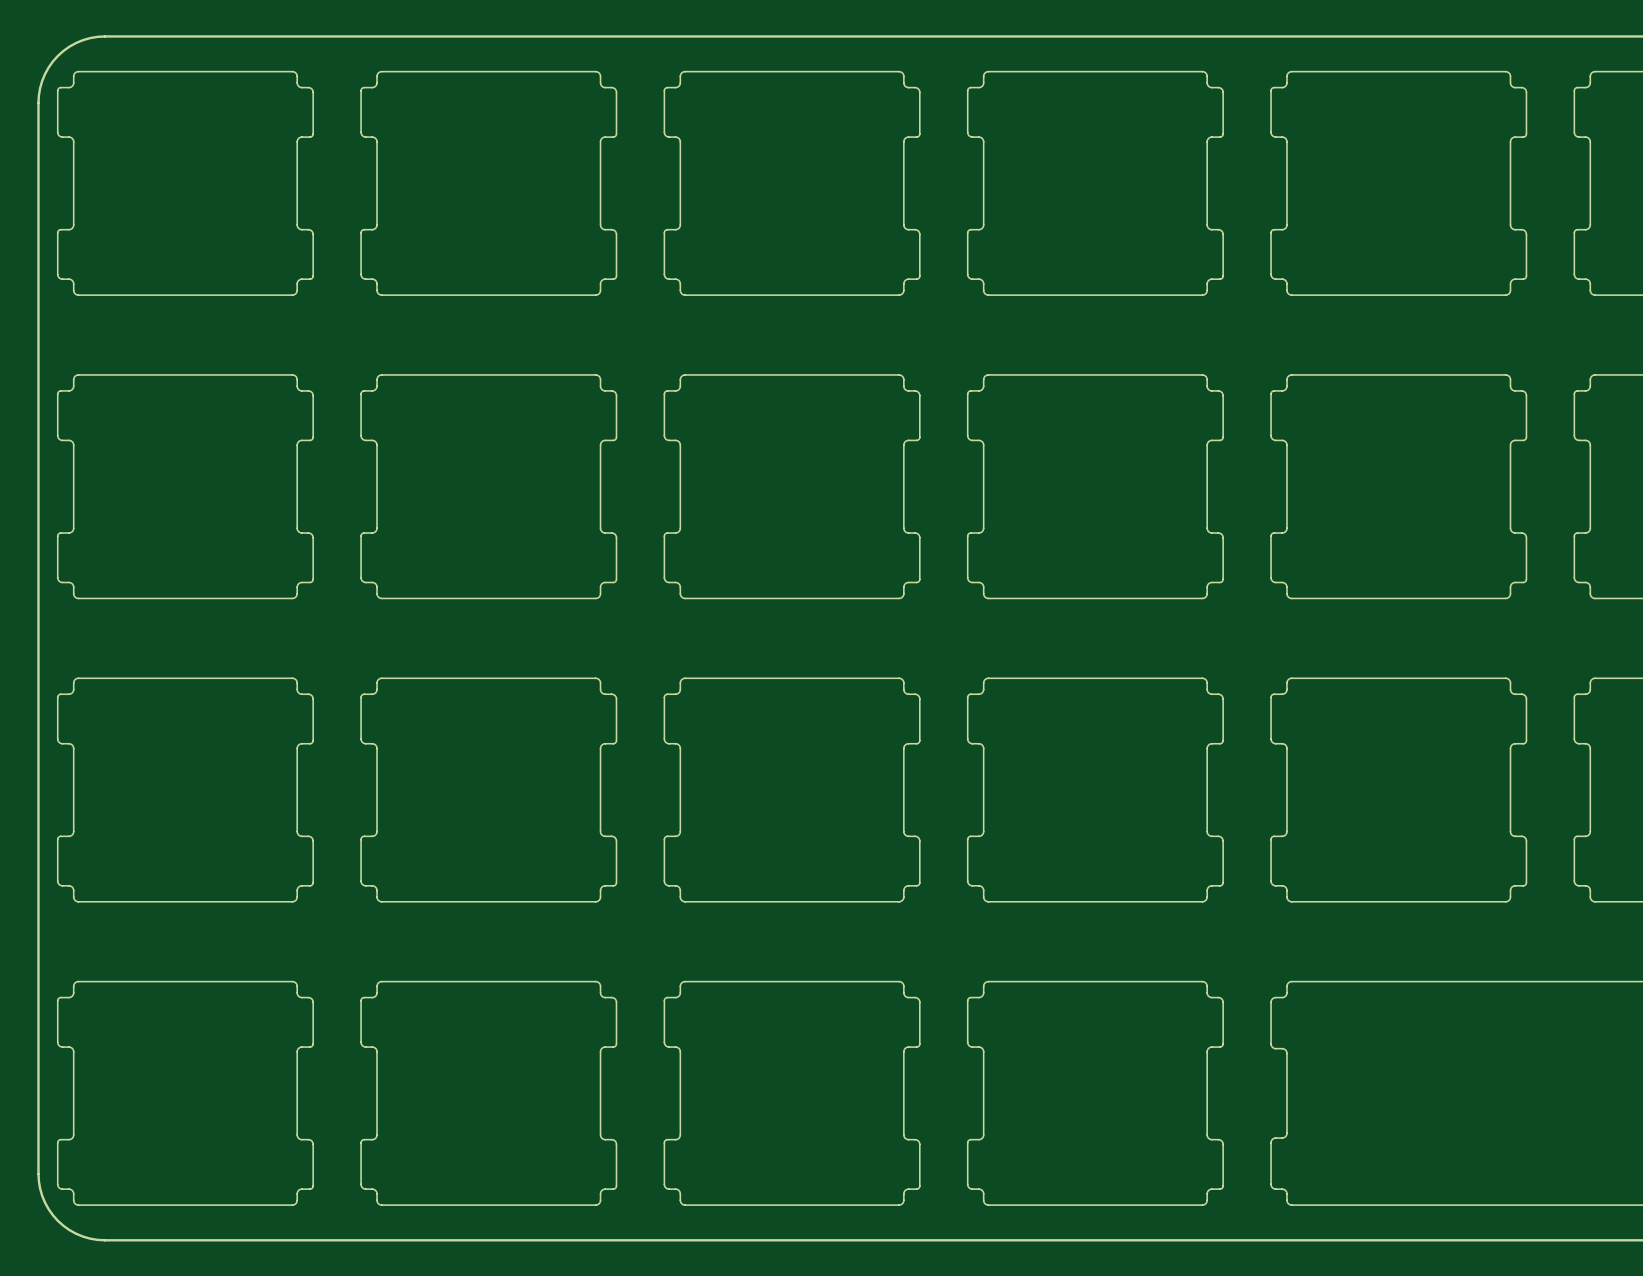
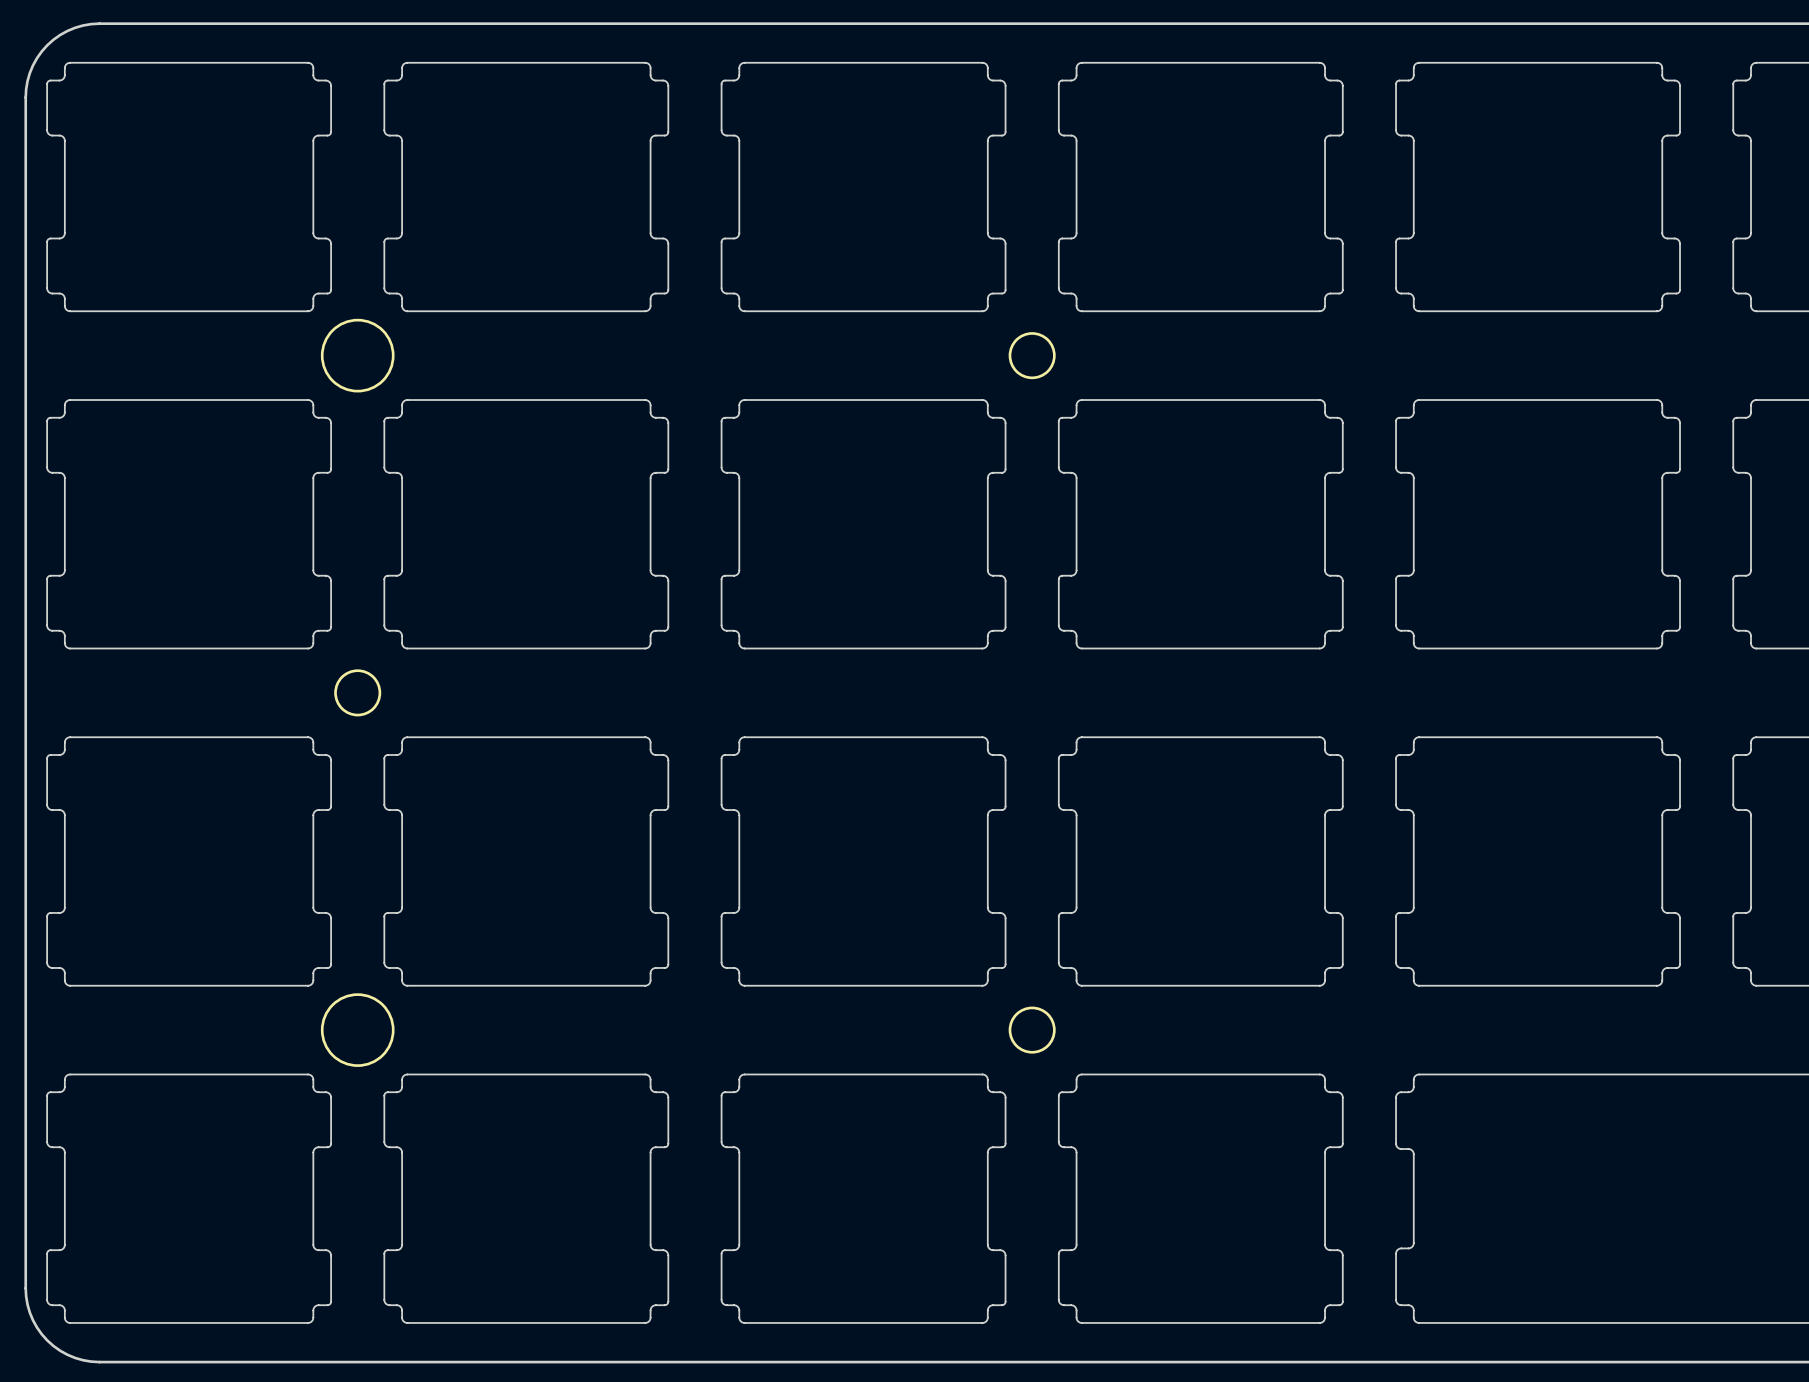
drawing: none -> [320, 318, 395, 393]
drawing: none -> [1008, 332, 1056, 380]
drawing: none -> [334, 669, 382, 717]
drawing: none -> [320, 993, 395, 1067]
drawing: none -> [1008, 1006, 1056, 1054]

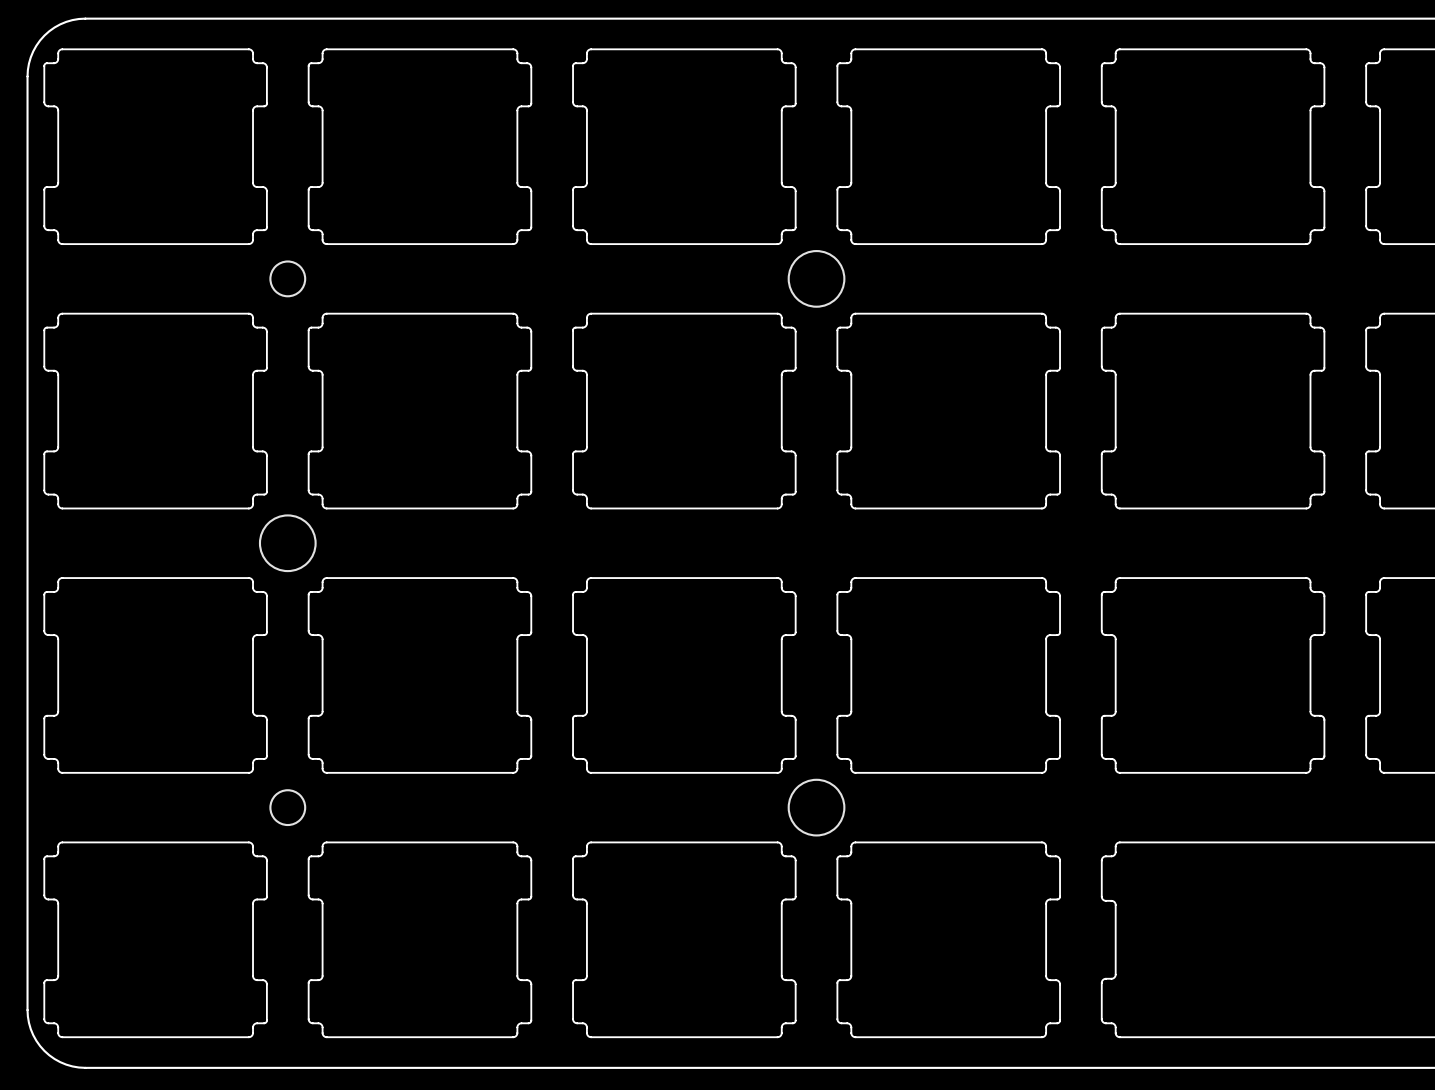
drawing shape: [320, 318, 395, 393] -> [269, 260, 307, 298]
drawing shape: [1008, 332, 1056, 380] -> [787, 250, 846, 308]
drawing shape: [334, 669, 382, 717] -> [258, 514, 317, 573]
drawing shape: [320, 993, 395, 1067] -> [269, 789, 307, 827]
drawing shape: [1008, 1006, 1056, 1054] -> [787, 778, 846, 837]

